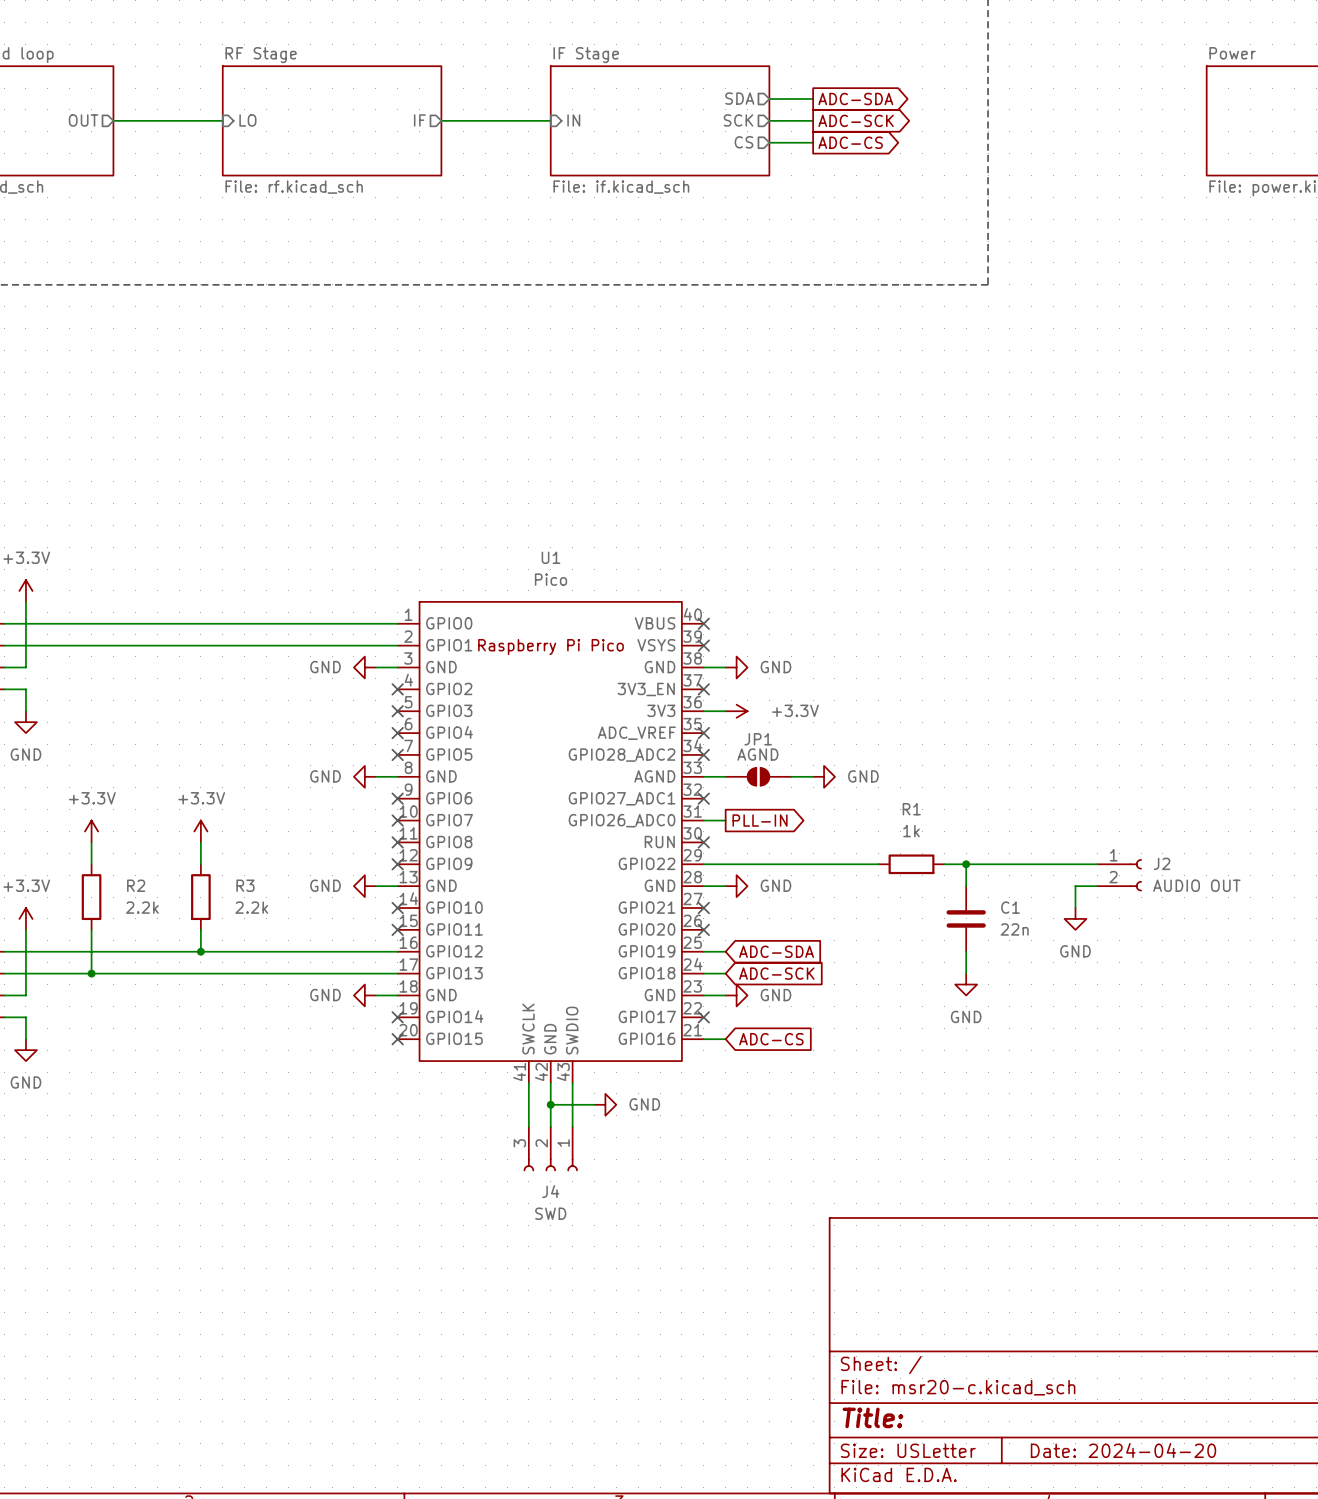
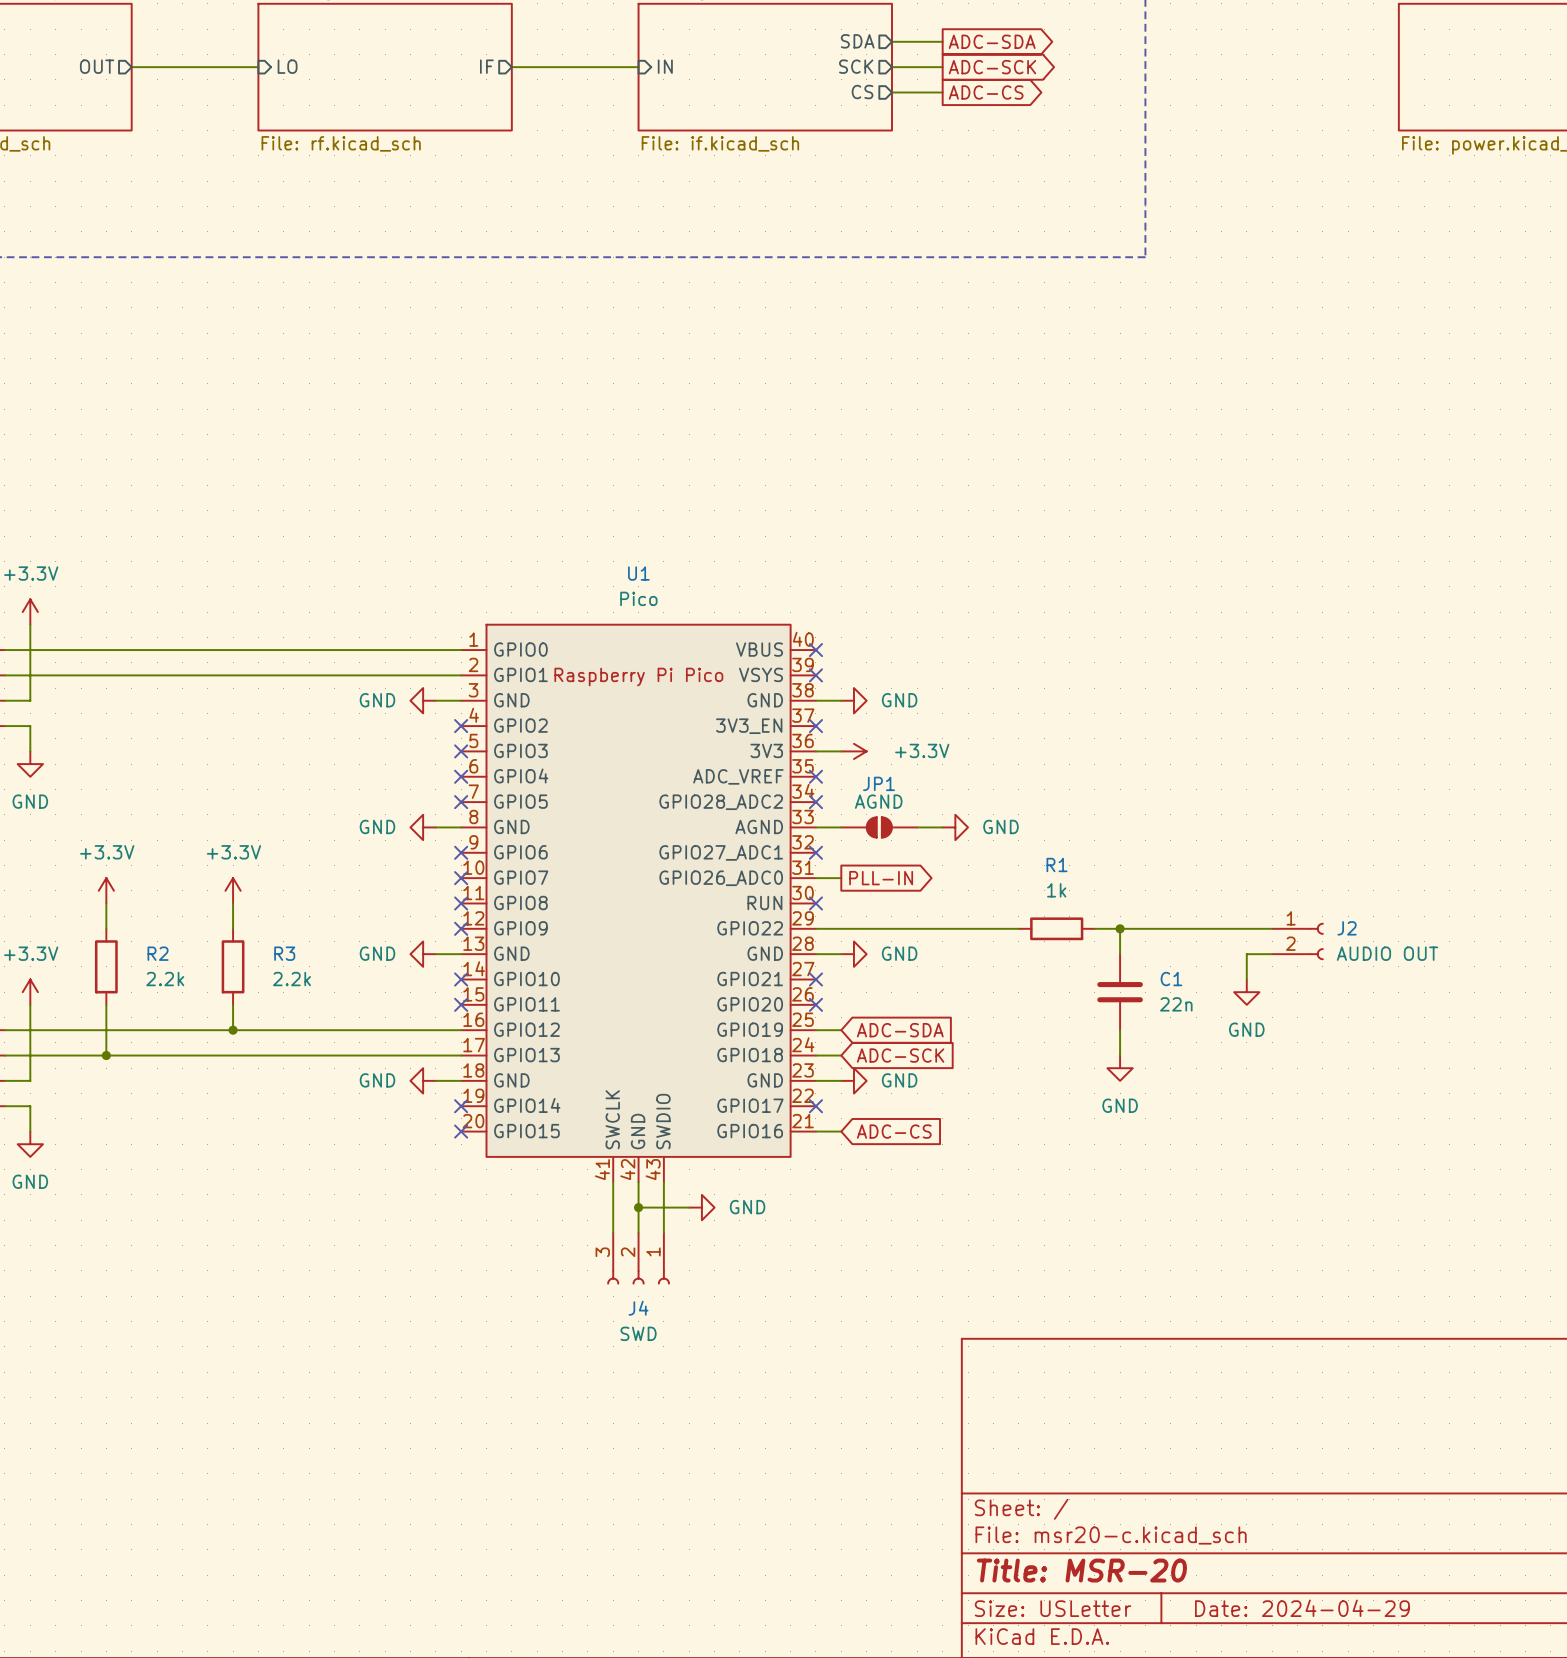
title block: Title: (872, 1417) -> Title: MSR-20 (1081, 1570)
title block: Date: 2024-04-20 (1123, 1450) -> Date: 2024-04-29 (1302, 1608)

